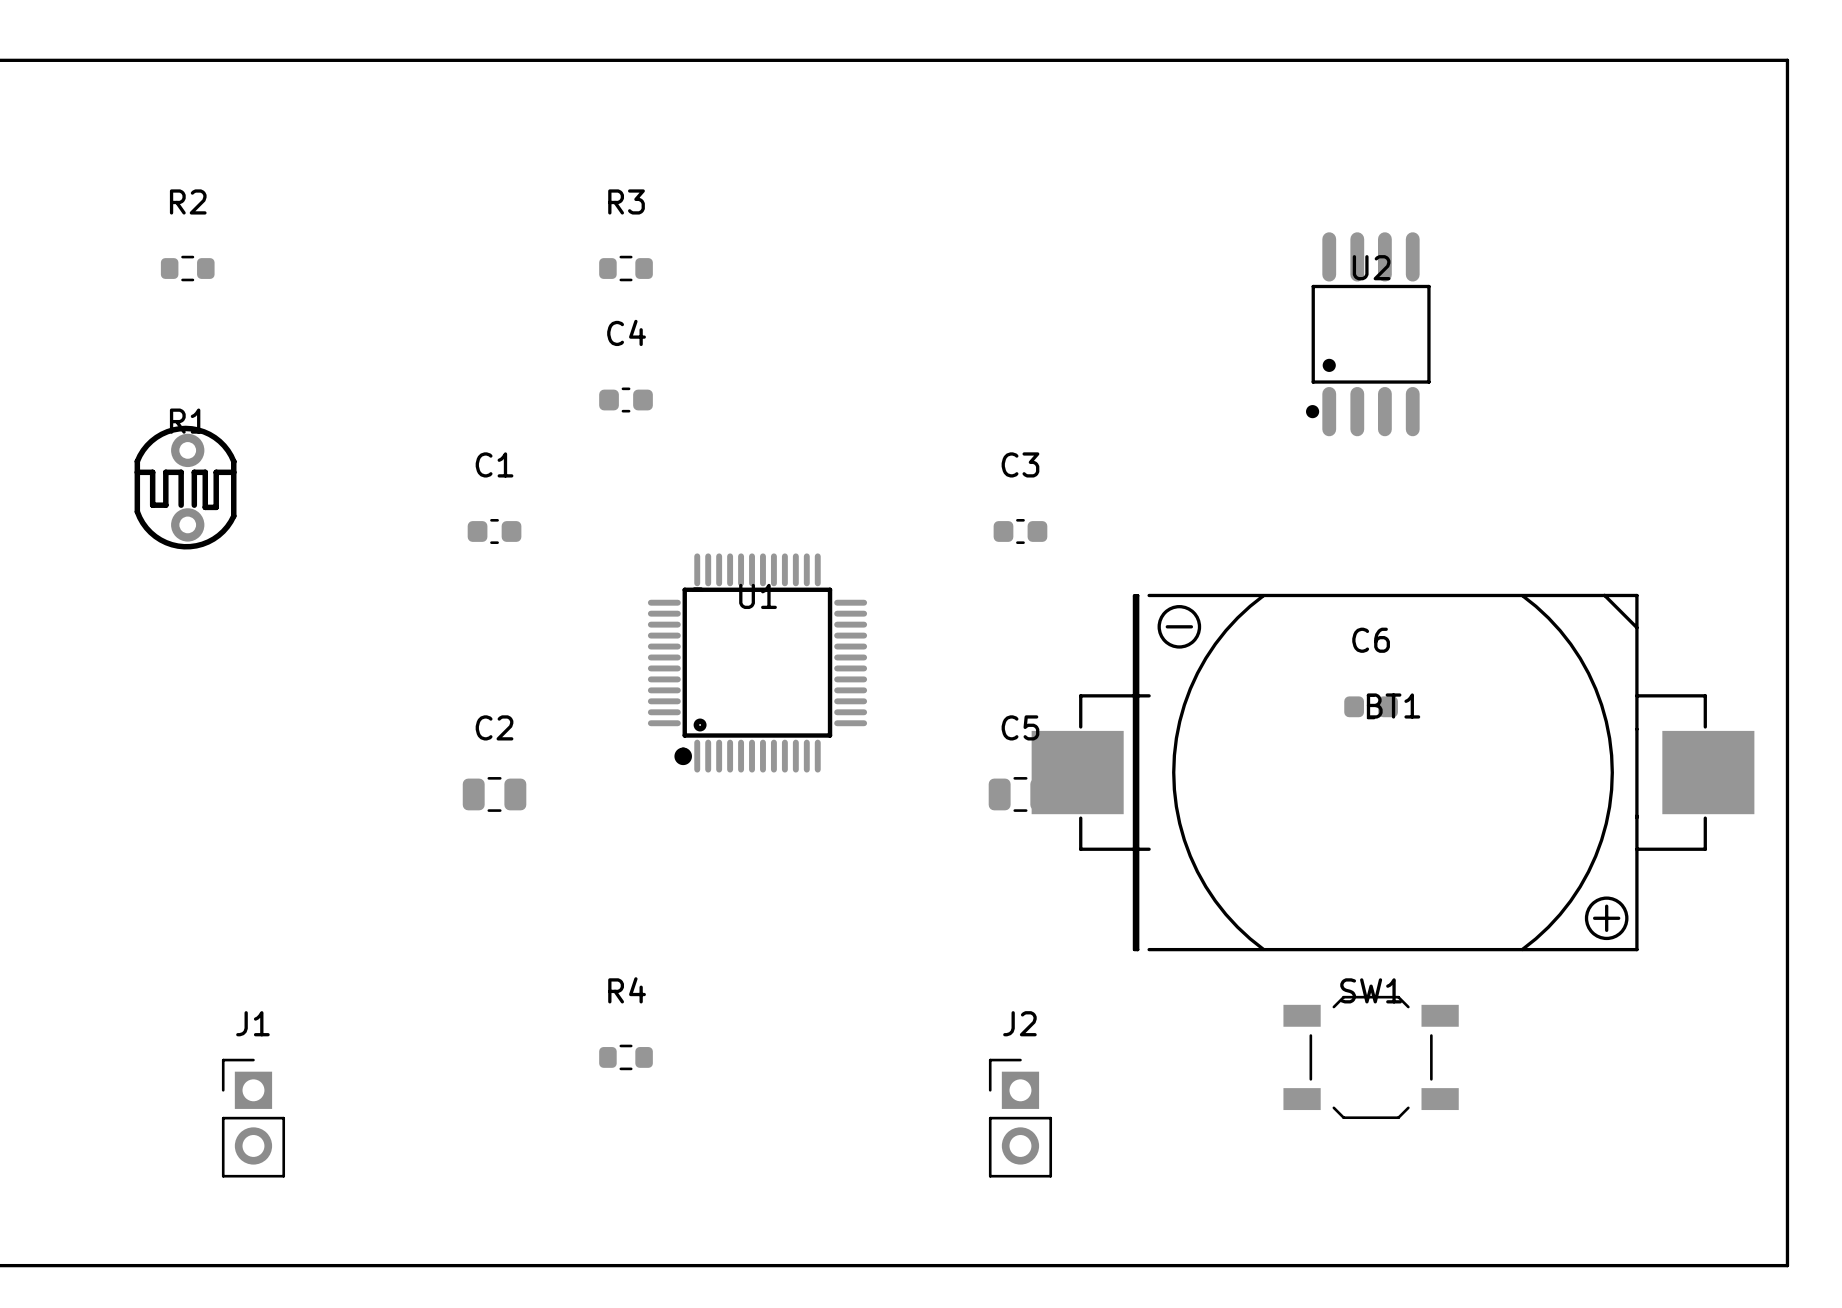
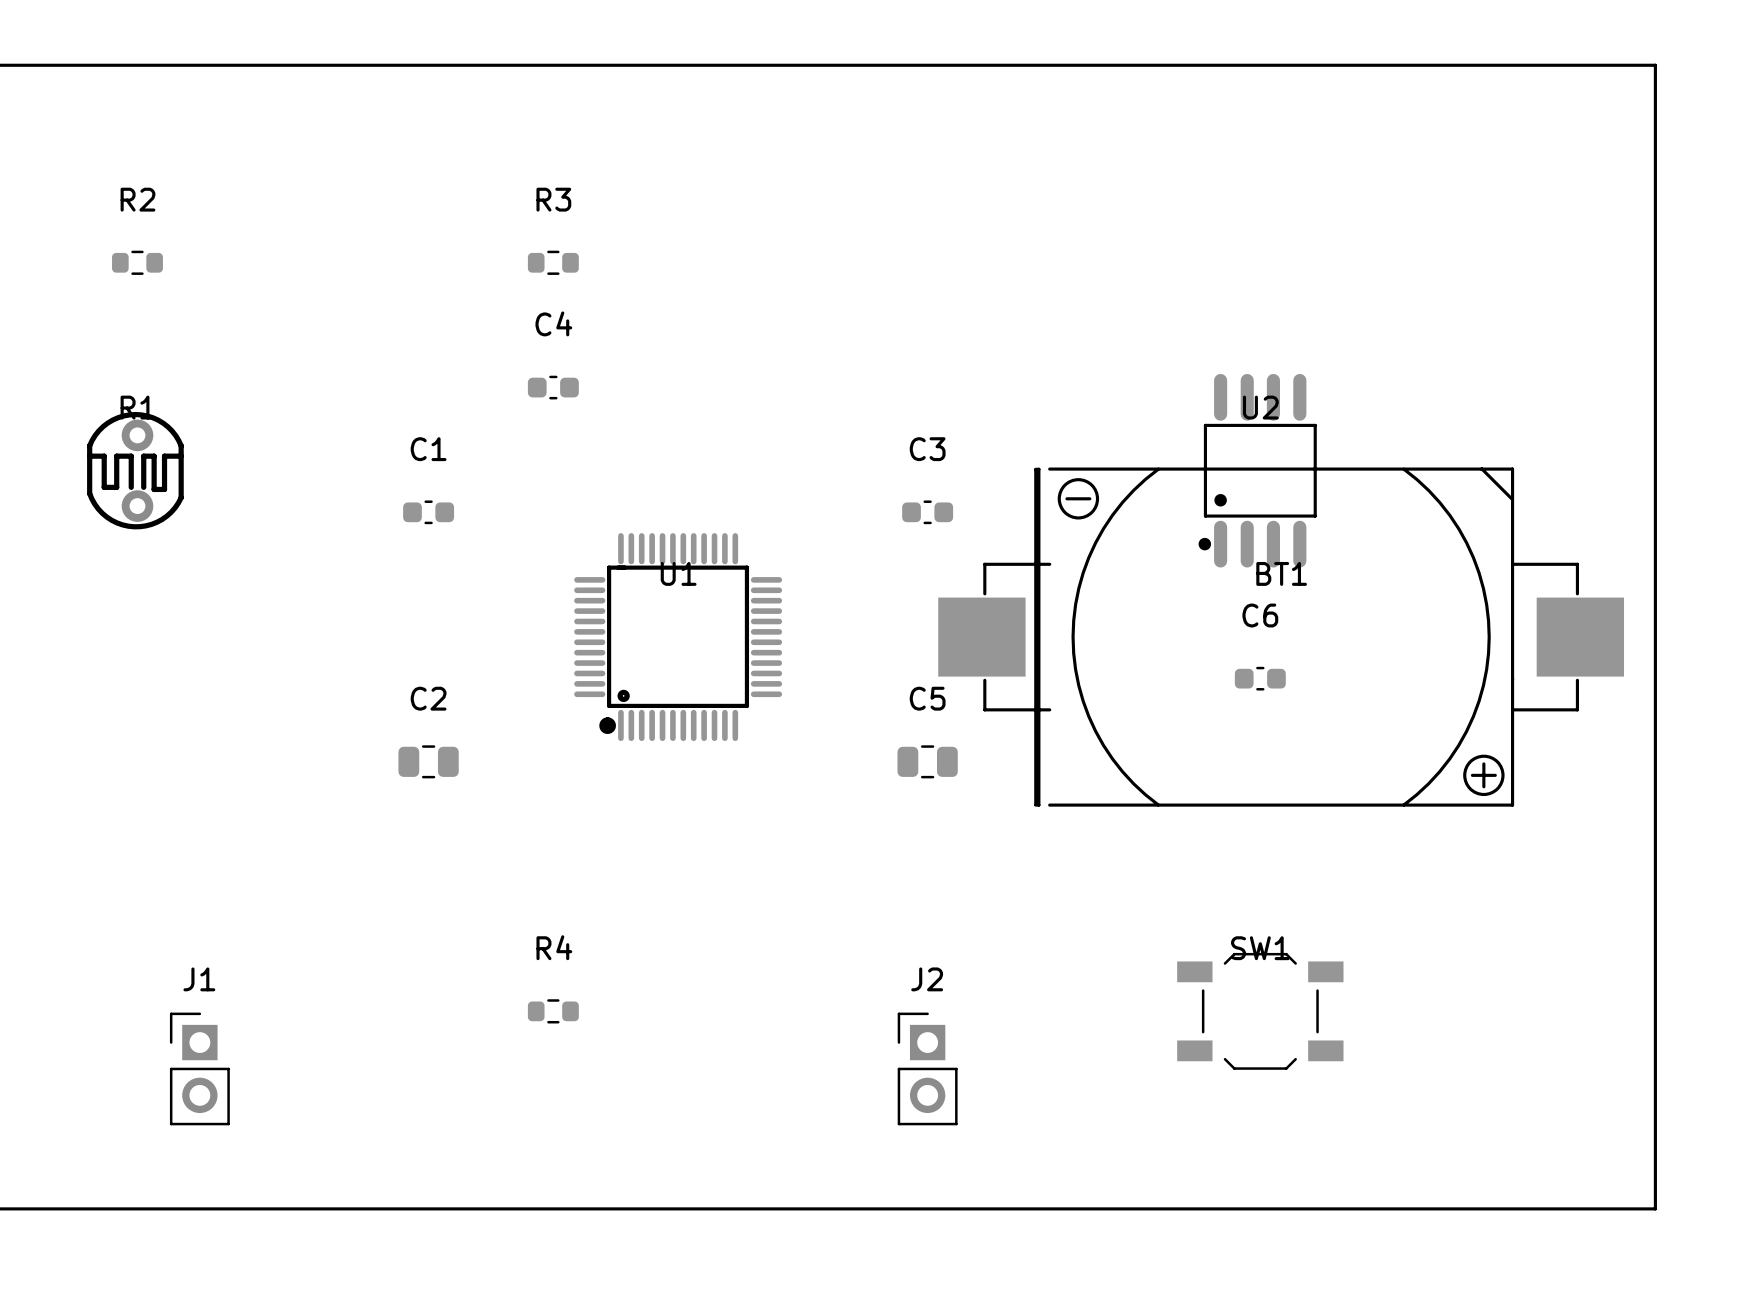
U2 position: (1368, 334) -> (1257, 470)
BT1 position: (1393, 772) -> (1281, 637)

